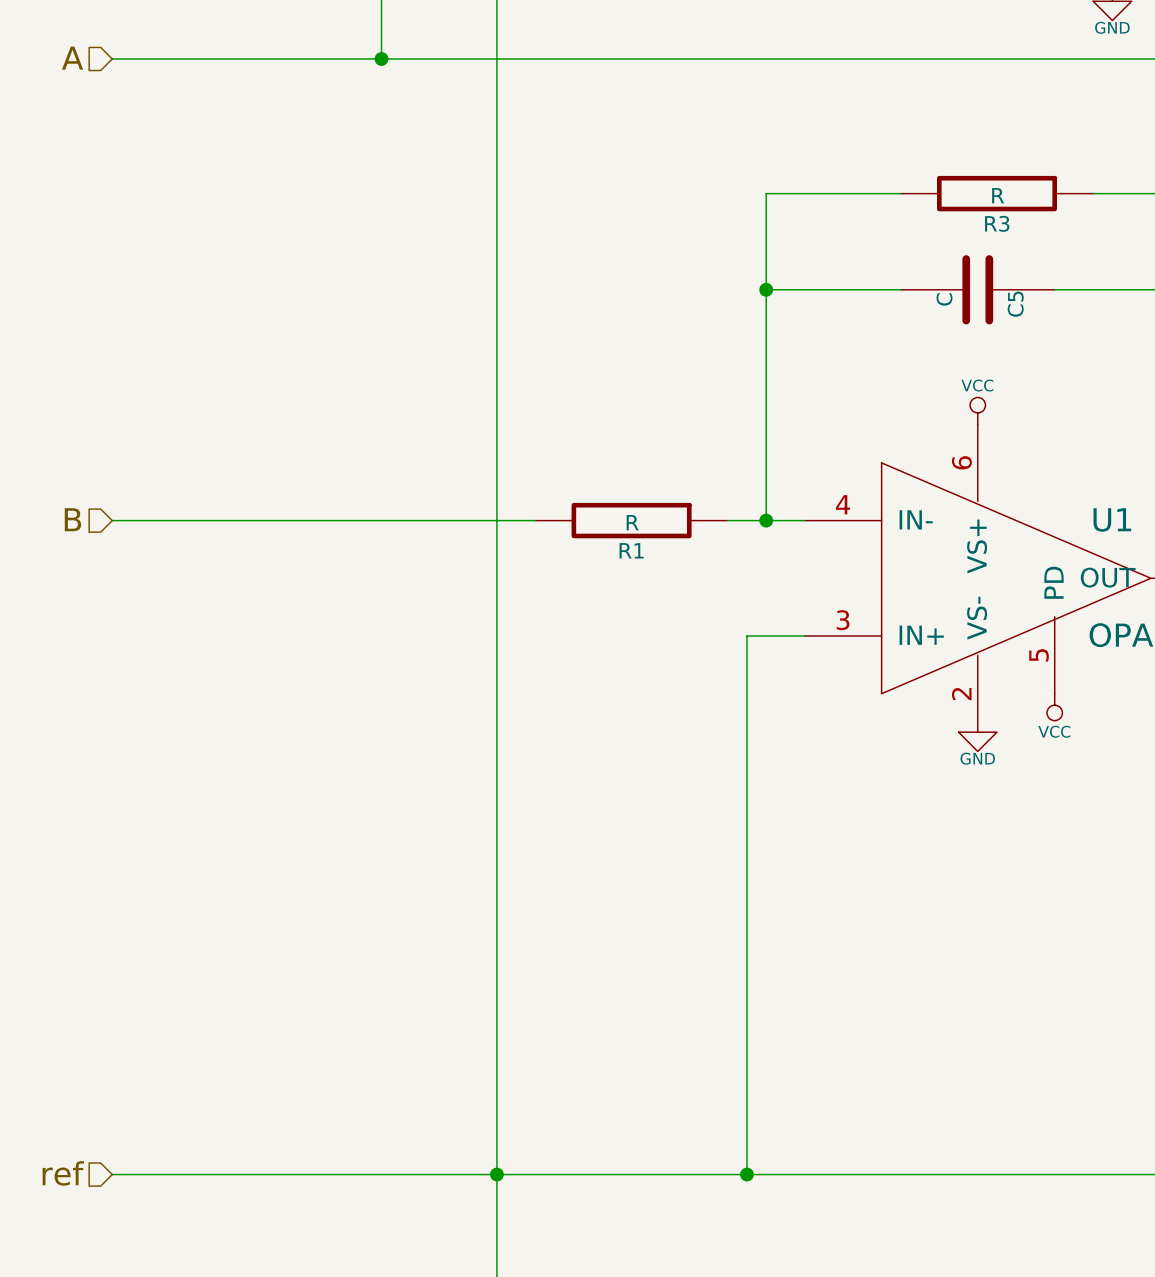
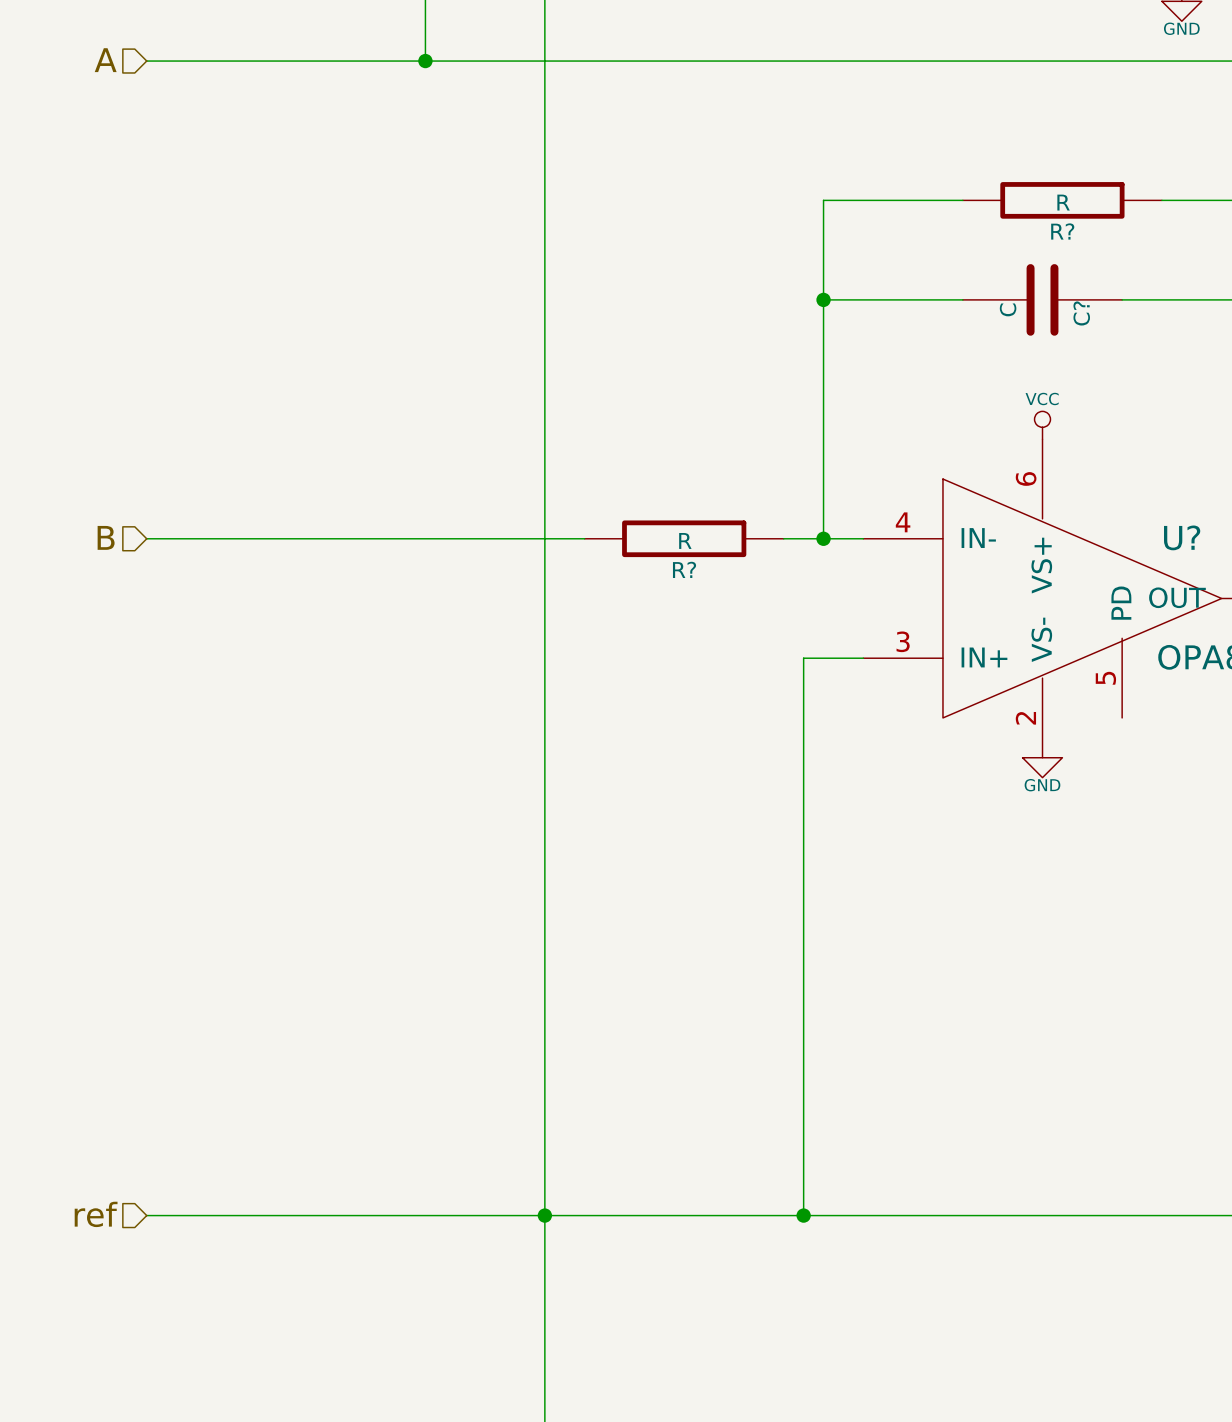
R3 name: R3 (997, 223) -> R? (1062, 231)
C5 name: C5 (1015, 304) -> C? (1081, 313)
U1 name: U1 (1112, 519) -> U? (1182, 537)
R1 name: R1 (631, 550) -> R? (684, 569)
power symbol: VCC (1054, 707) -> none

